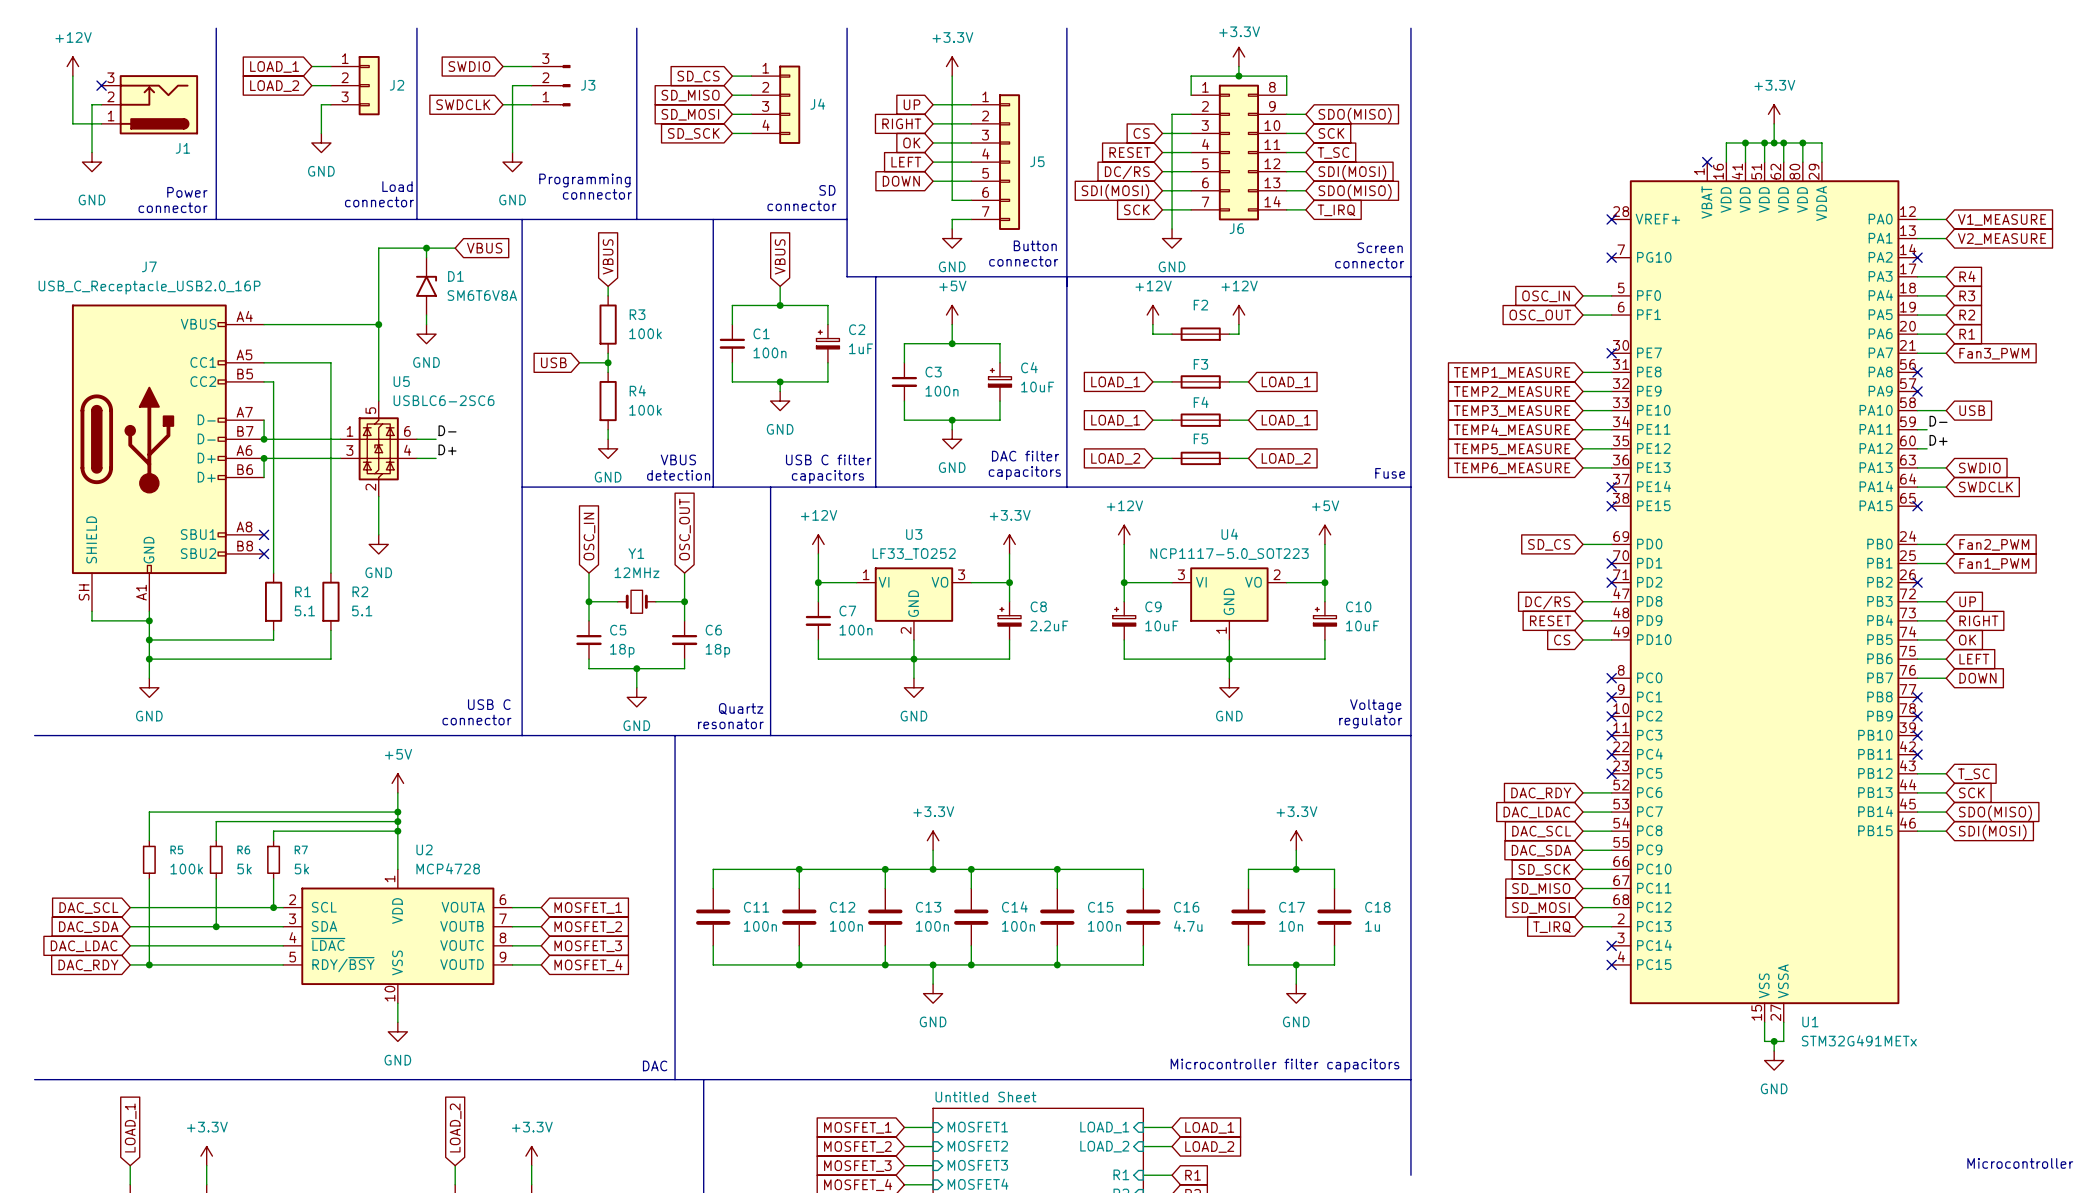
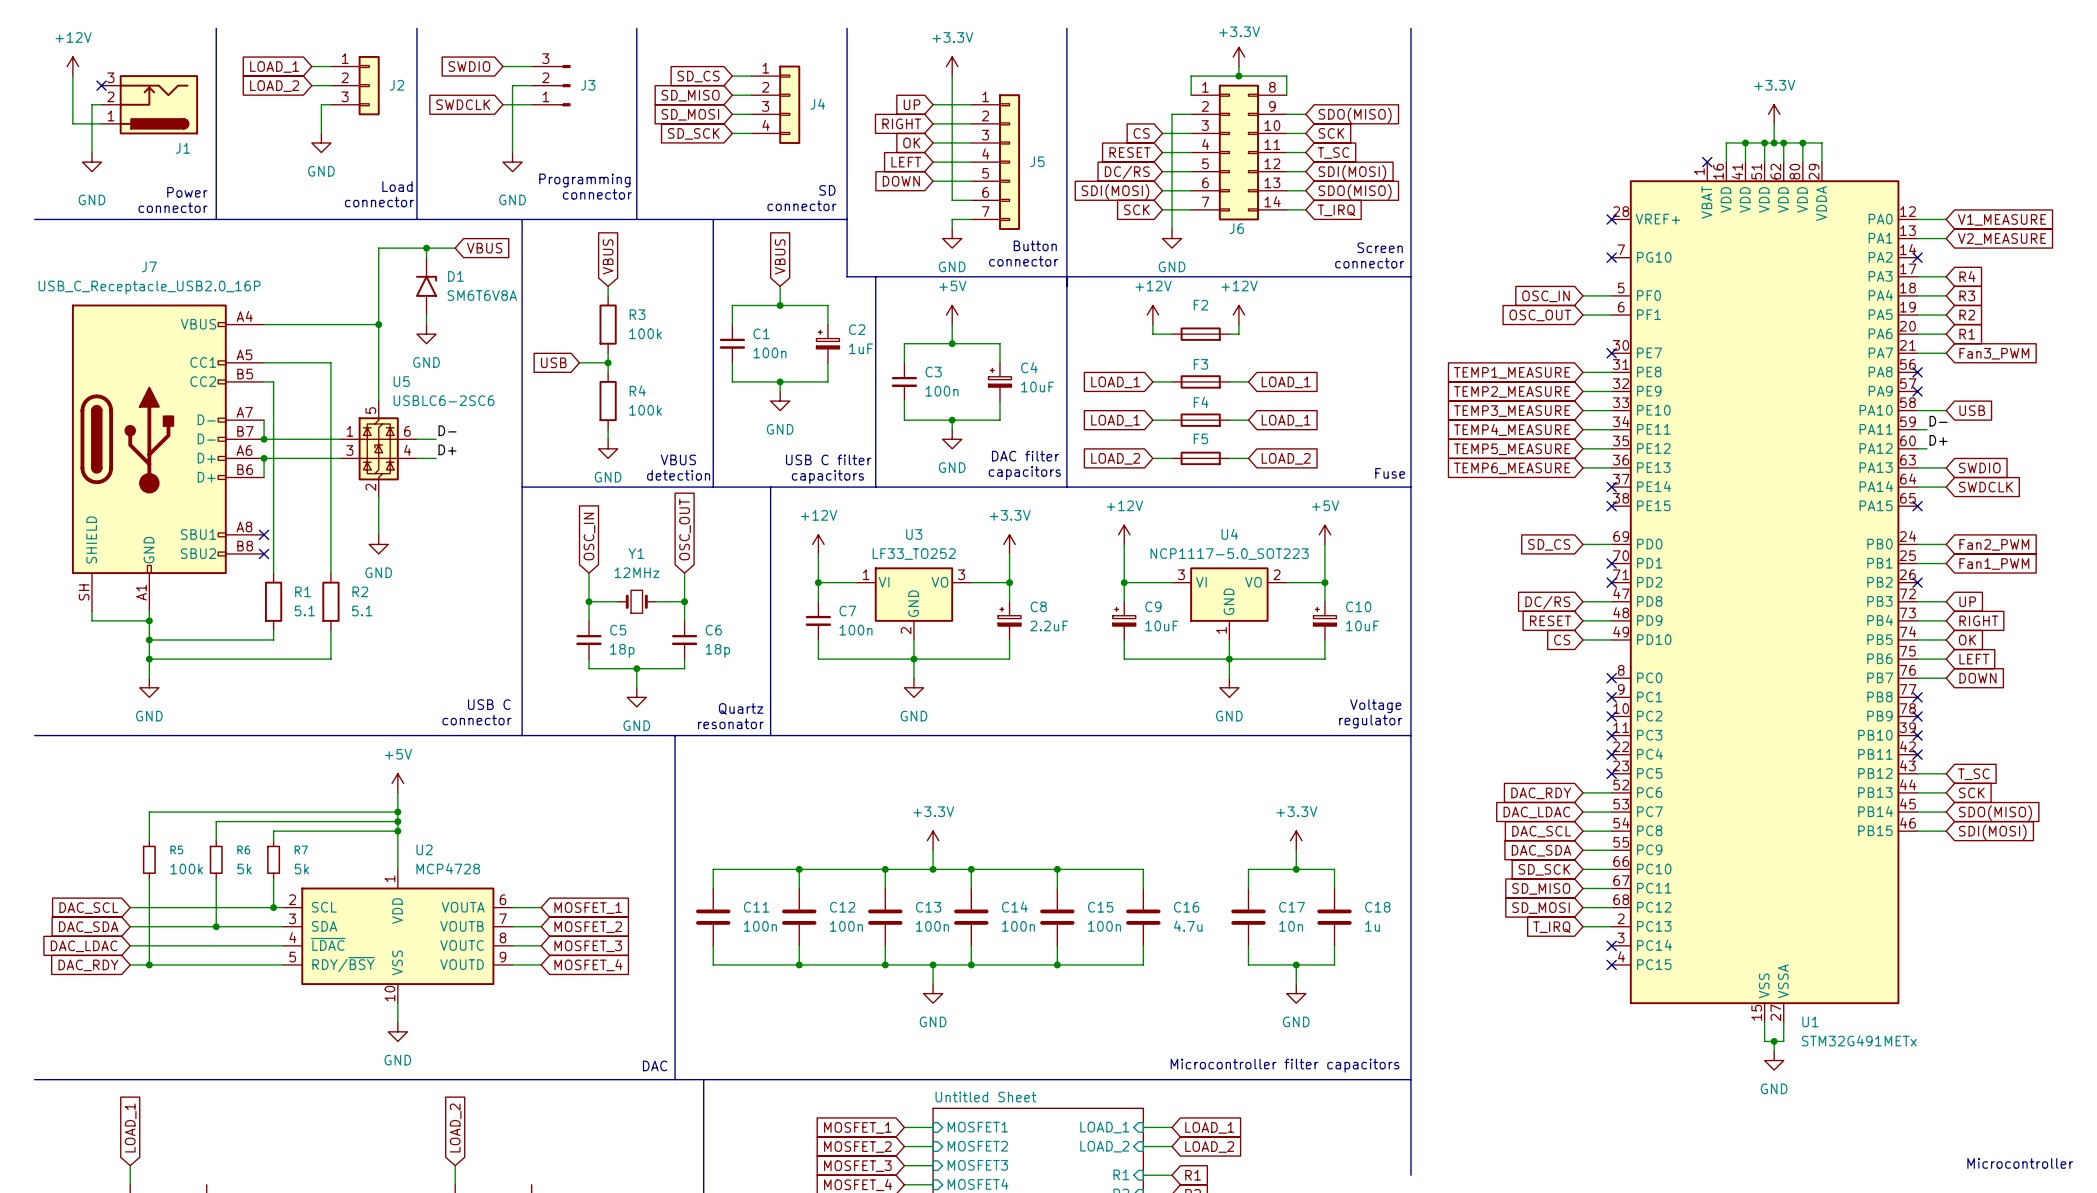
power symbol: +3.3V (206, 1156) -> none
power symbol: +3.3V (531, 1156) -> none
wire: (206, 1165) (206, 1184) -> none
wire: (531, 1165) (531, 1184) -> none

